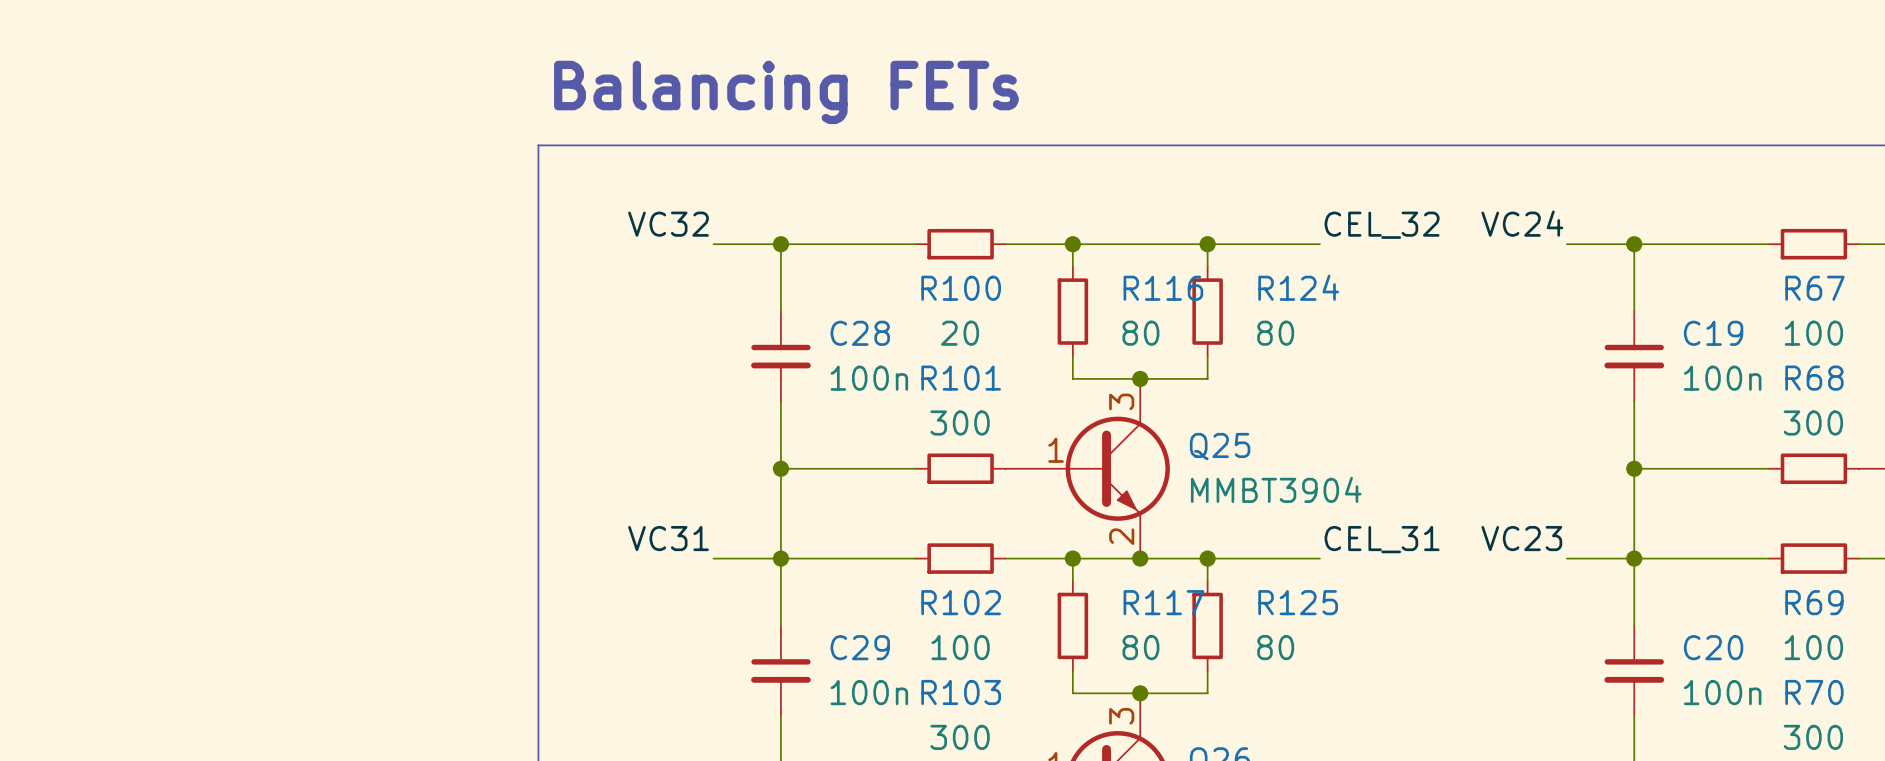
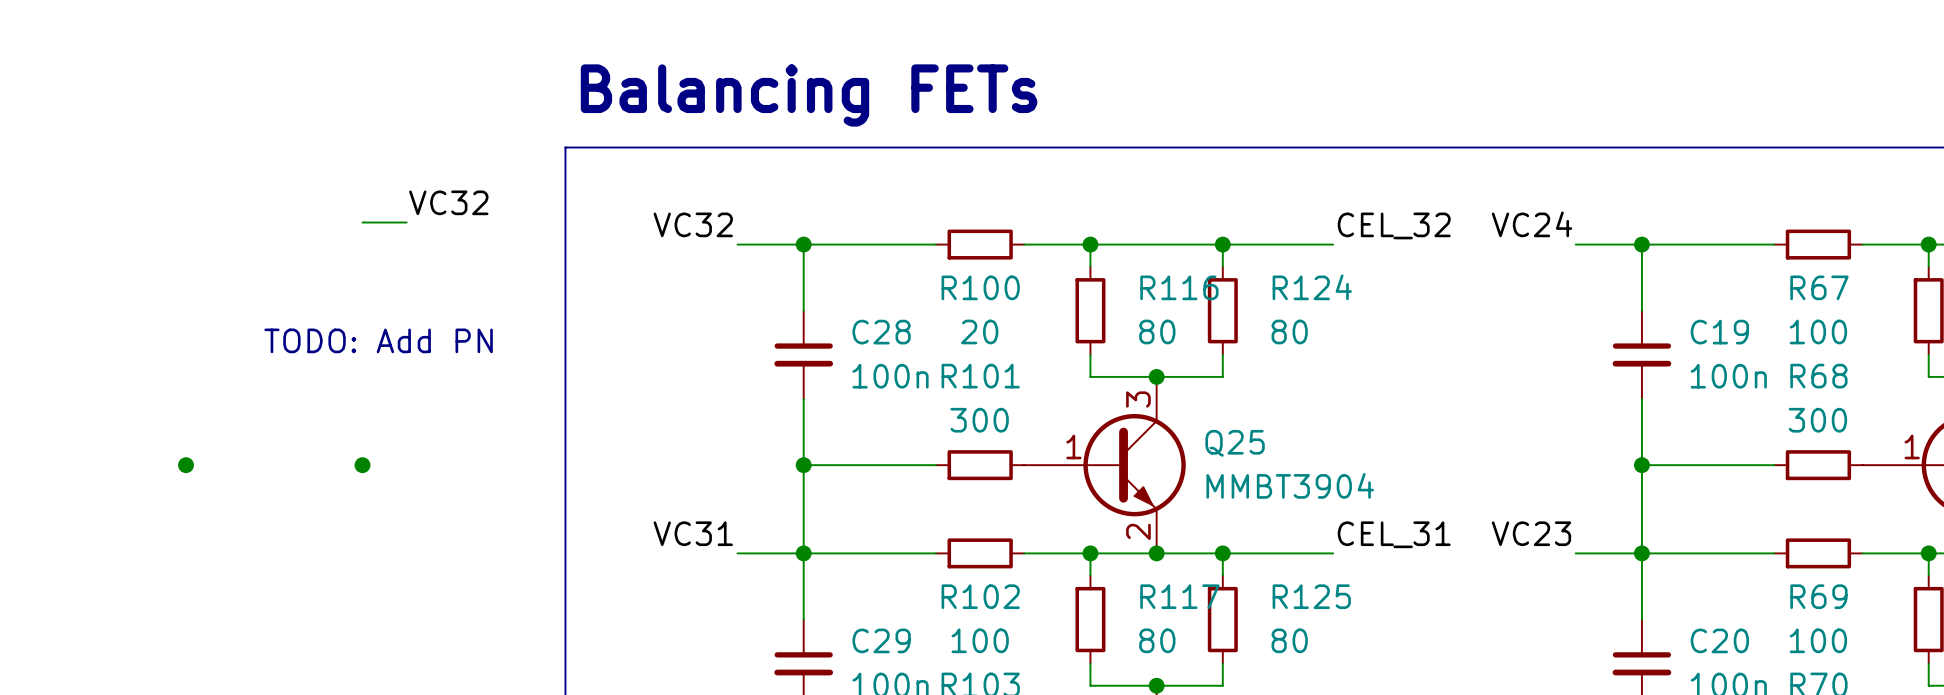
label: none -> VC32 (448, 202)
wire: none -> (362, 222) (406, 222)
text: none -> TODO: Add PN (378, 340)
junction: none -> (186, 465)
junction: none -> (362, 465)

